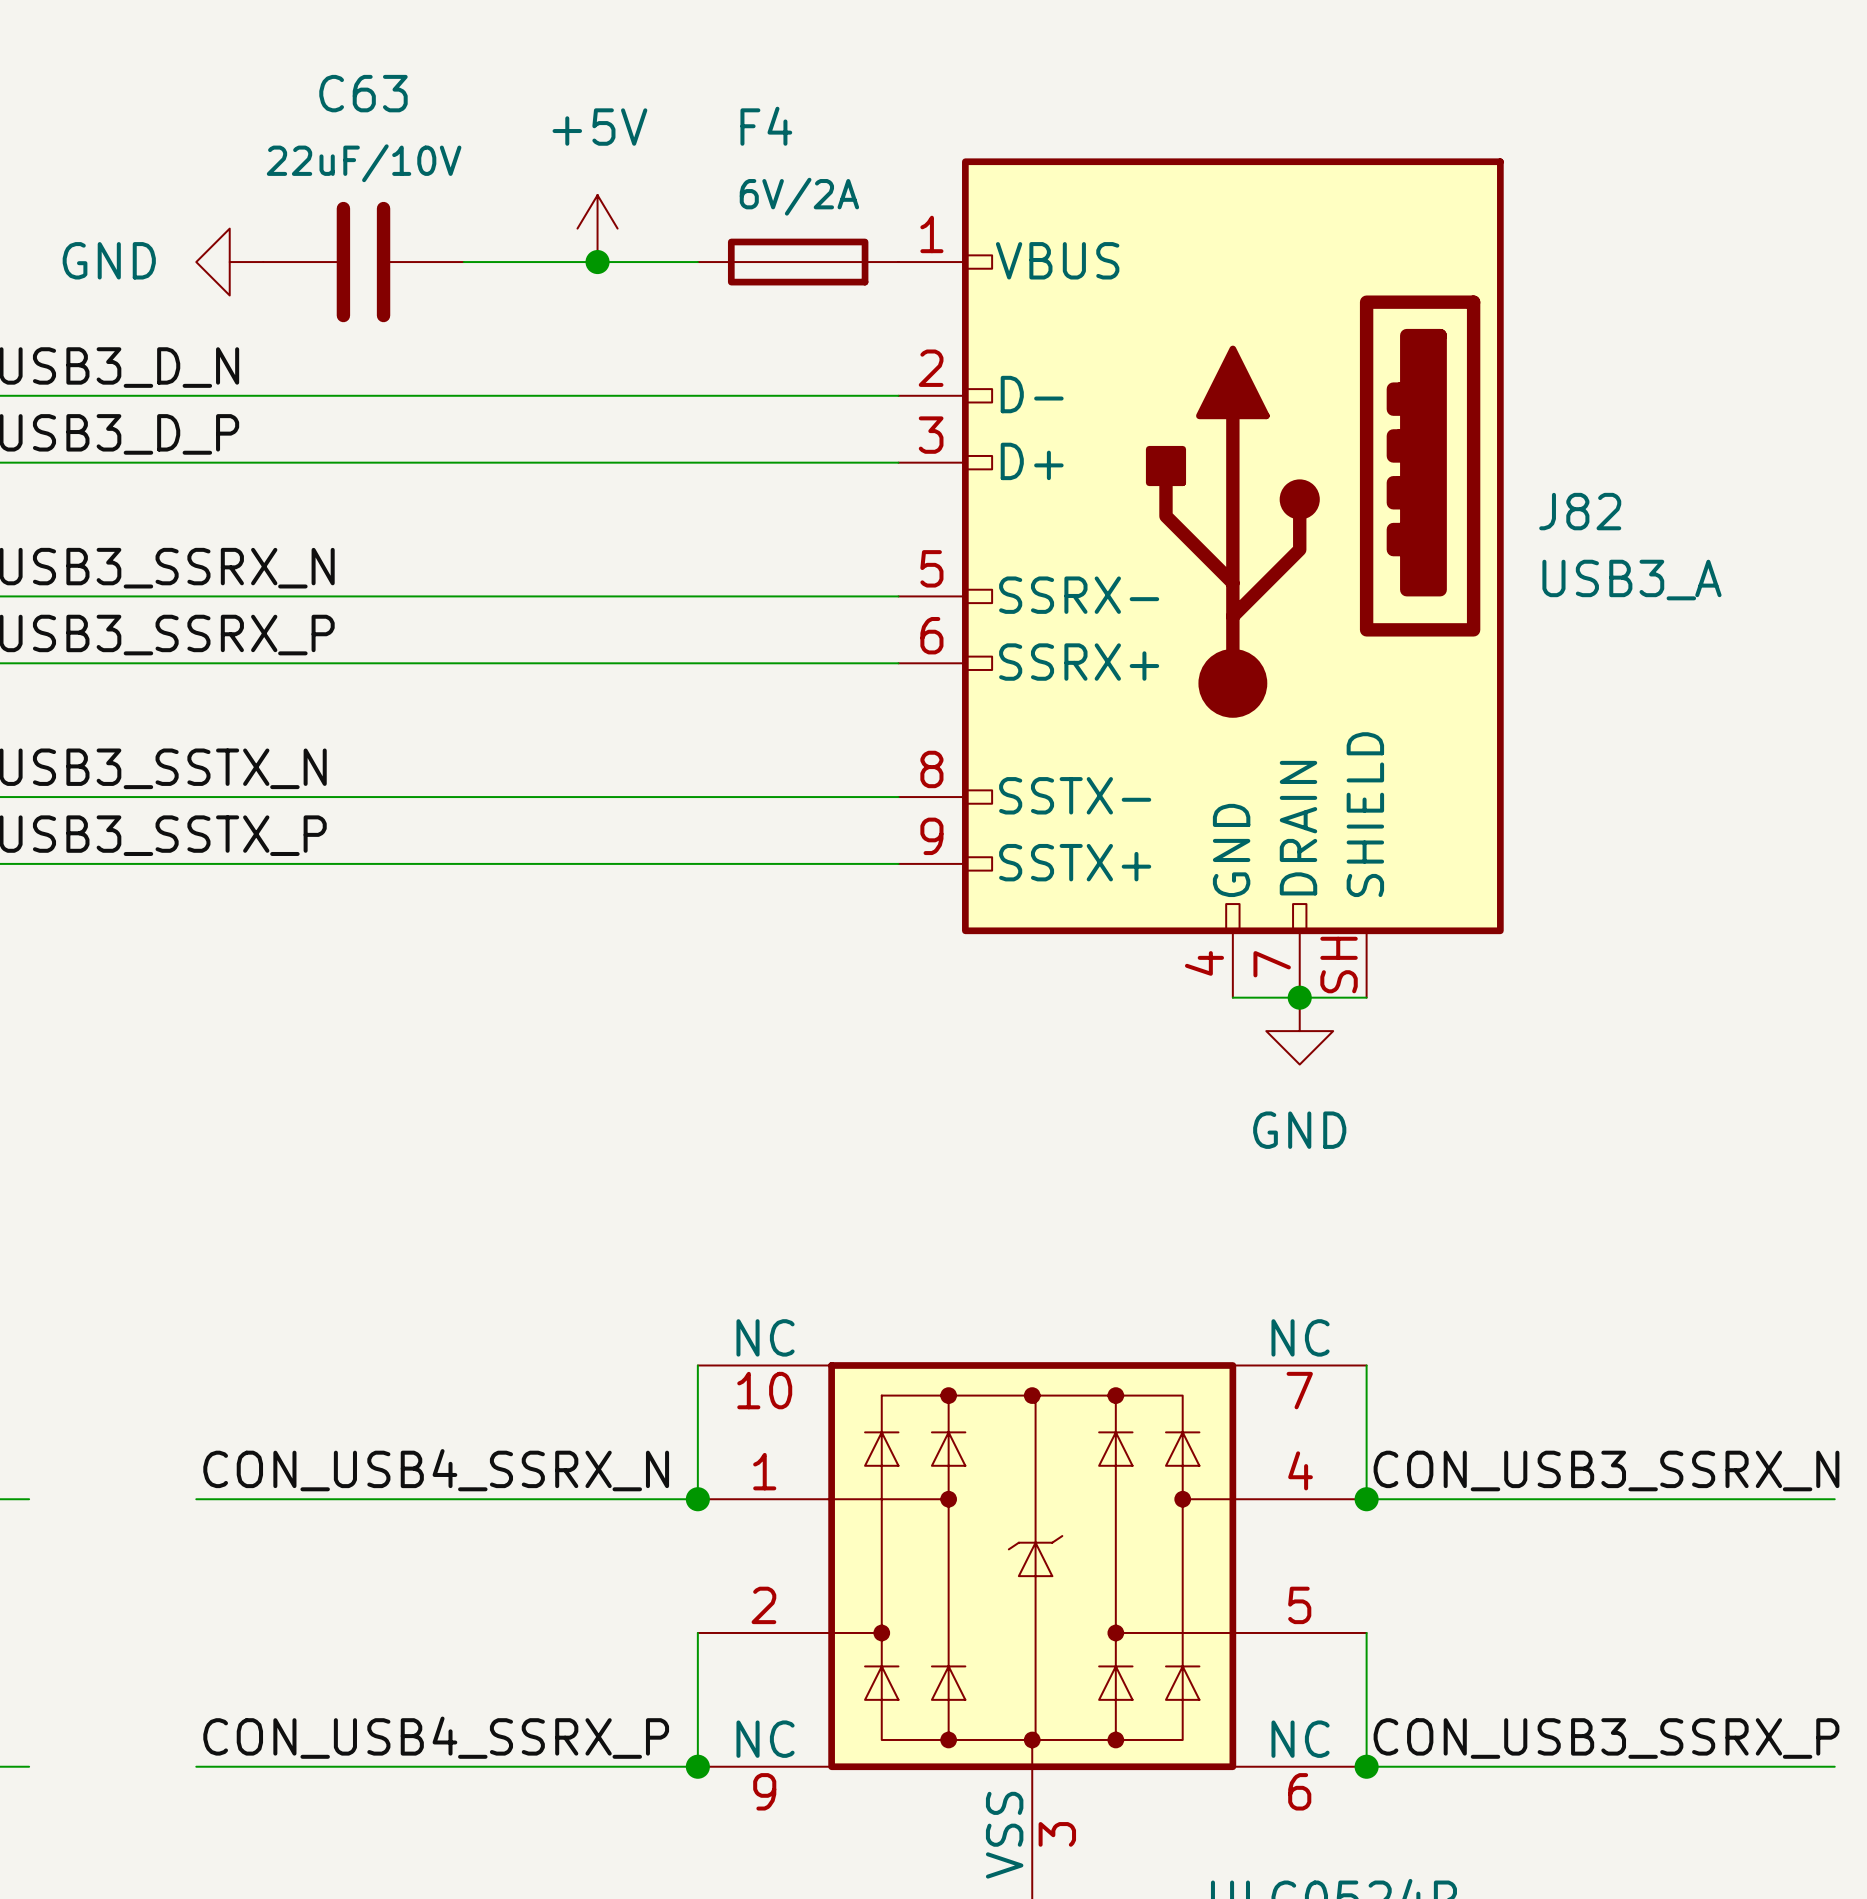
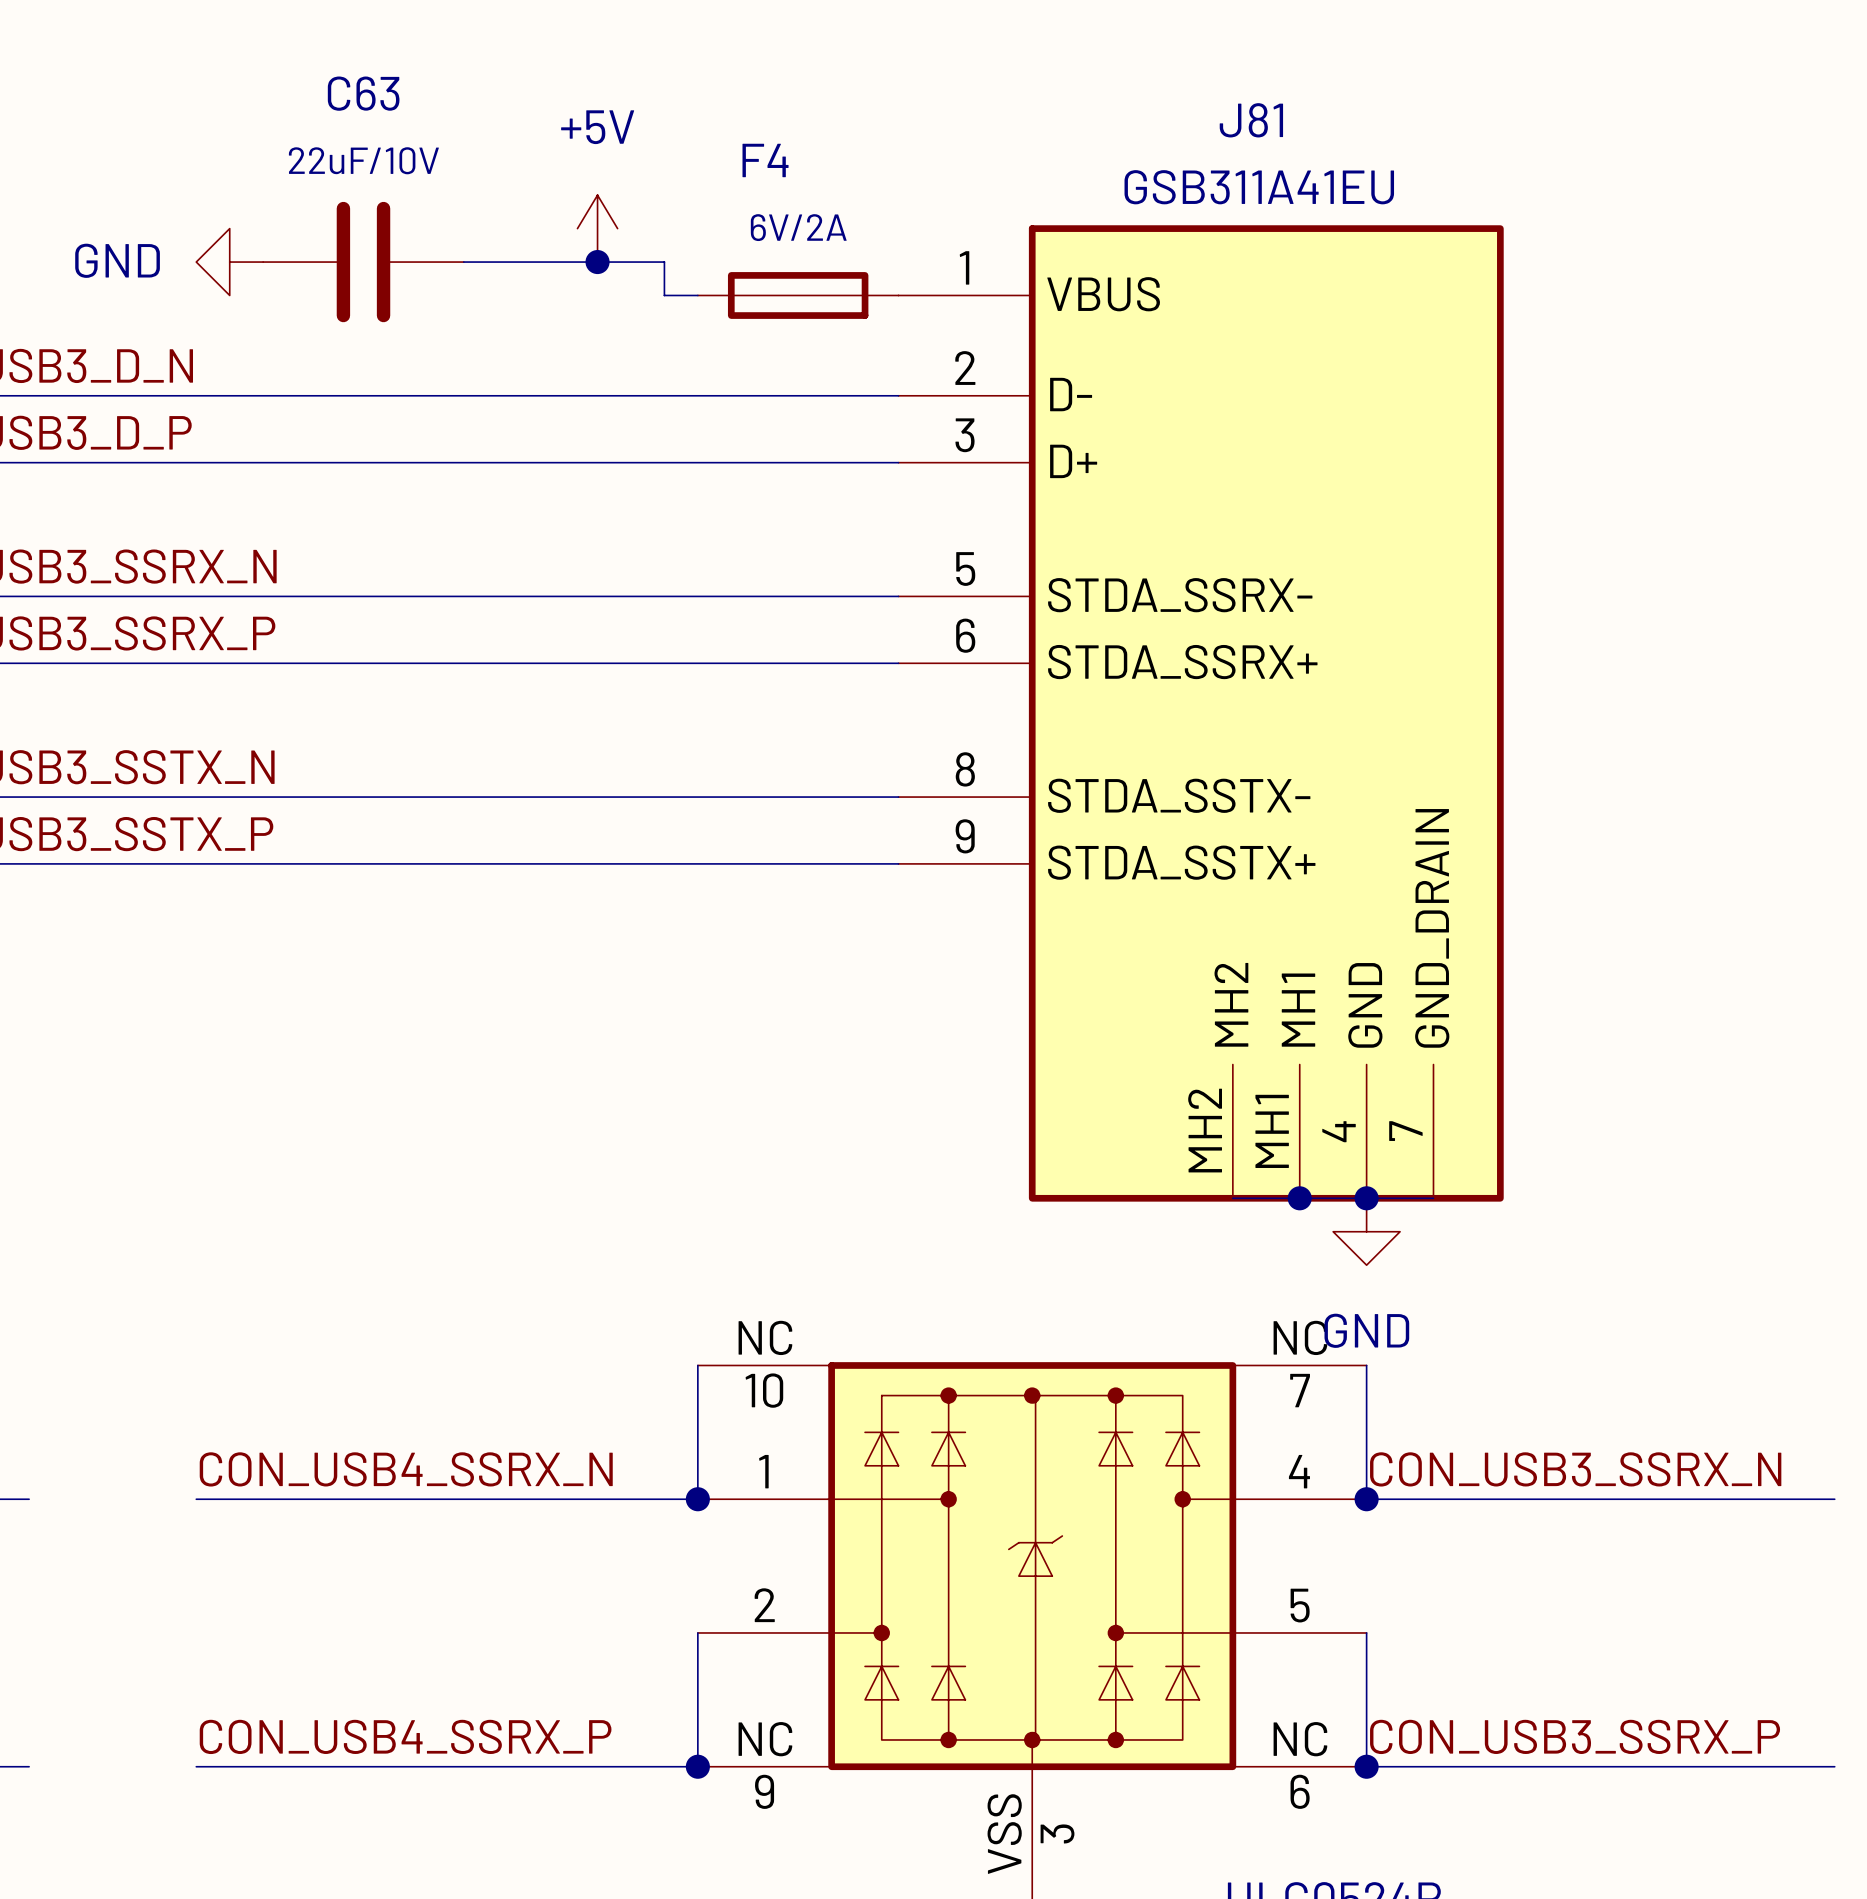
wire: (664, 262) (697, 262) -> (664, 262) (664, 295) (697, 295)
F4 position: (798, 262) -> (798, 295)
J82: USB3_A (1201, 578) -> none
J81: none -> GSB311A41EU (1201, 713)
junction: (1299, 997) -> none
power symbol position: GND (1299, 1031) -> GND (1366, 1231)
wire: none -> (1232, 1198) (1433, 1198)
junction: none -> (1299, 1198)
junction: none -> (1366, 1198)

